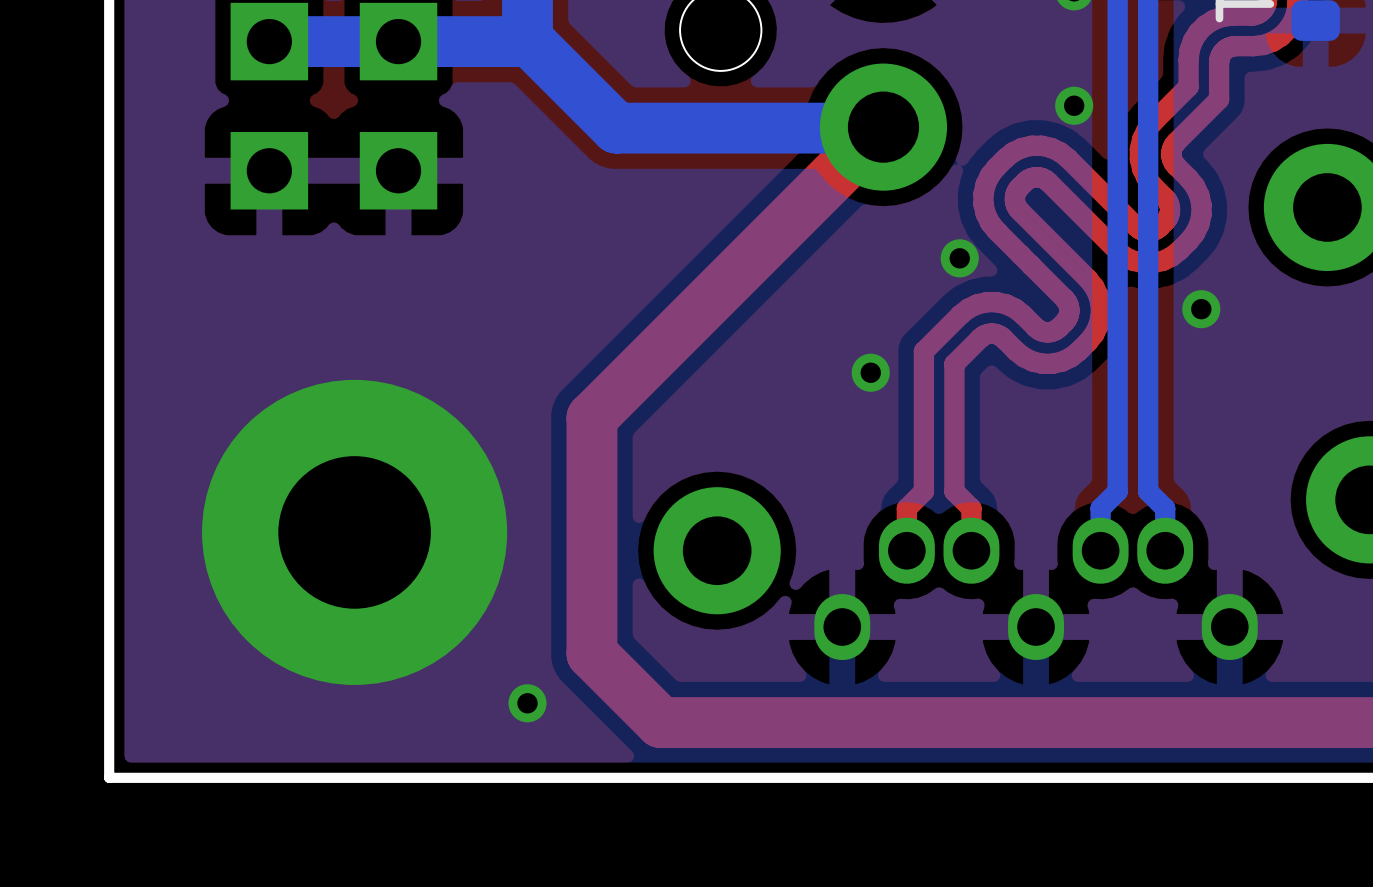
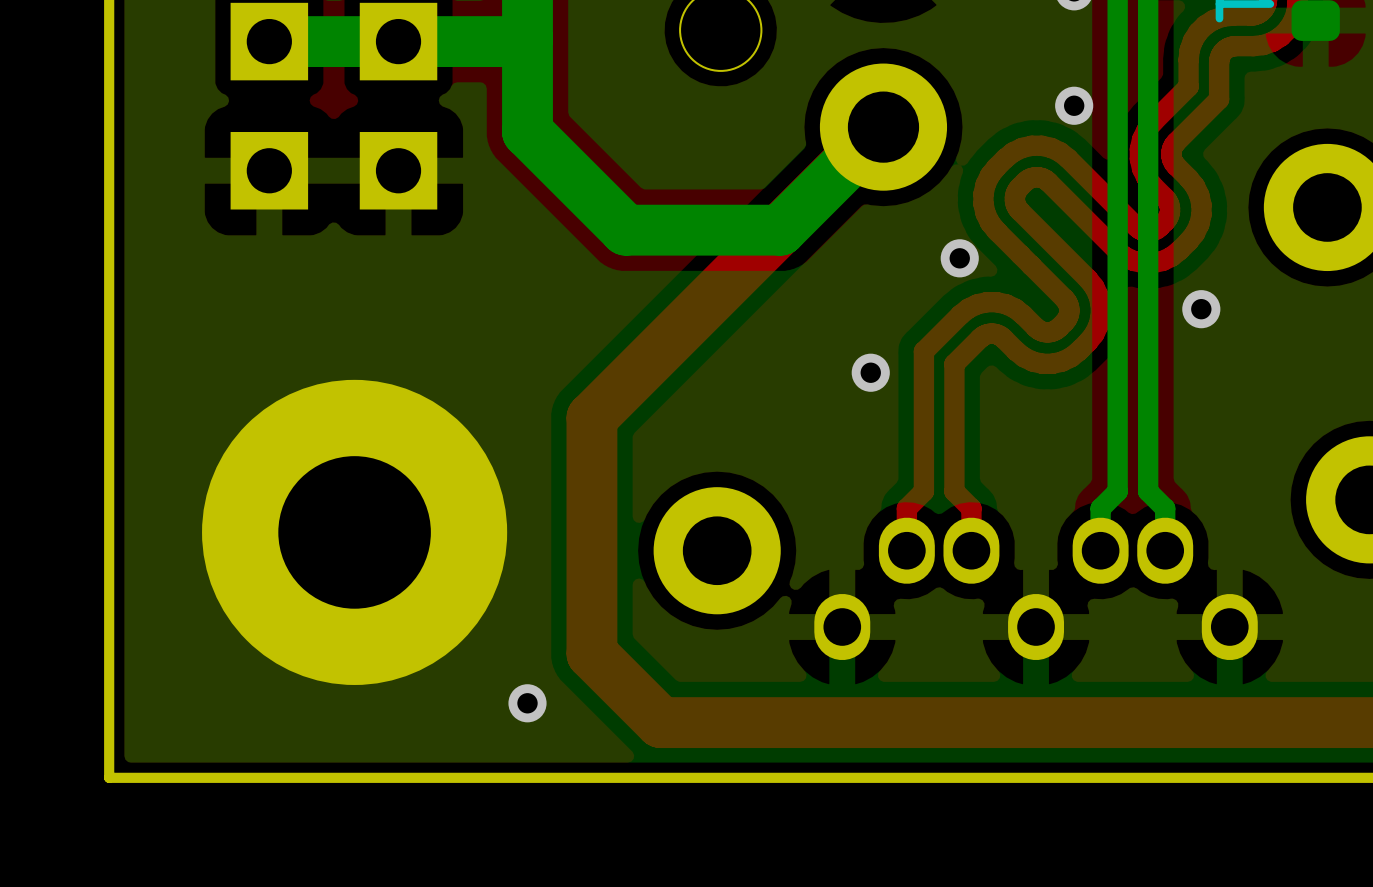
bottom track: (527, 39) (616, 128) (882, 128) -> (527, 39) (527, 131) (625, 230) (780, 230) (882, 128)

